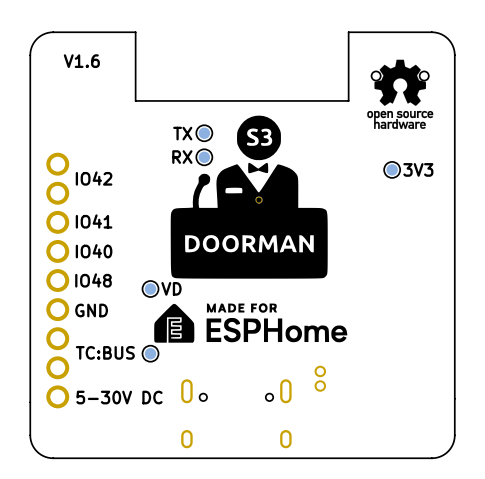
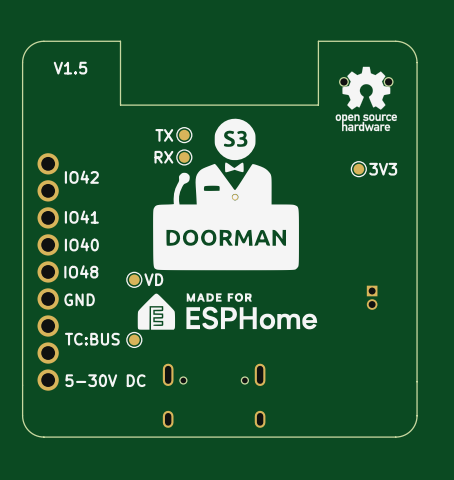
text: V1.6 (81, 61) -> V1.5 (70, 68)
part: none -> (372, 297)
part: (320, 378) -> none

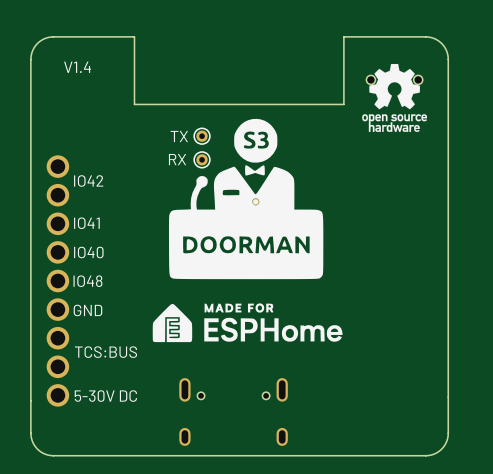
text: V1.5 (70, 68) -> V1.4 (77, 67)
part footprint: [176, 127, 193, 144] -> [193, 127, 211, 145]
part footprint: [176, 149, 193, 166] -> [193, 151, 211, 169]
part: (358, 169) -> none
text: 3V3 (383, 169) -> none
part: (134, 279) -> none
text: VD (153, 279) -> none
part: (372, 297) -> none
text: TC:BUS (92, 339) -> TCS:BUS (105, 352)
part: (134, 339) -> none

